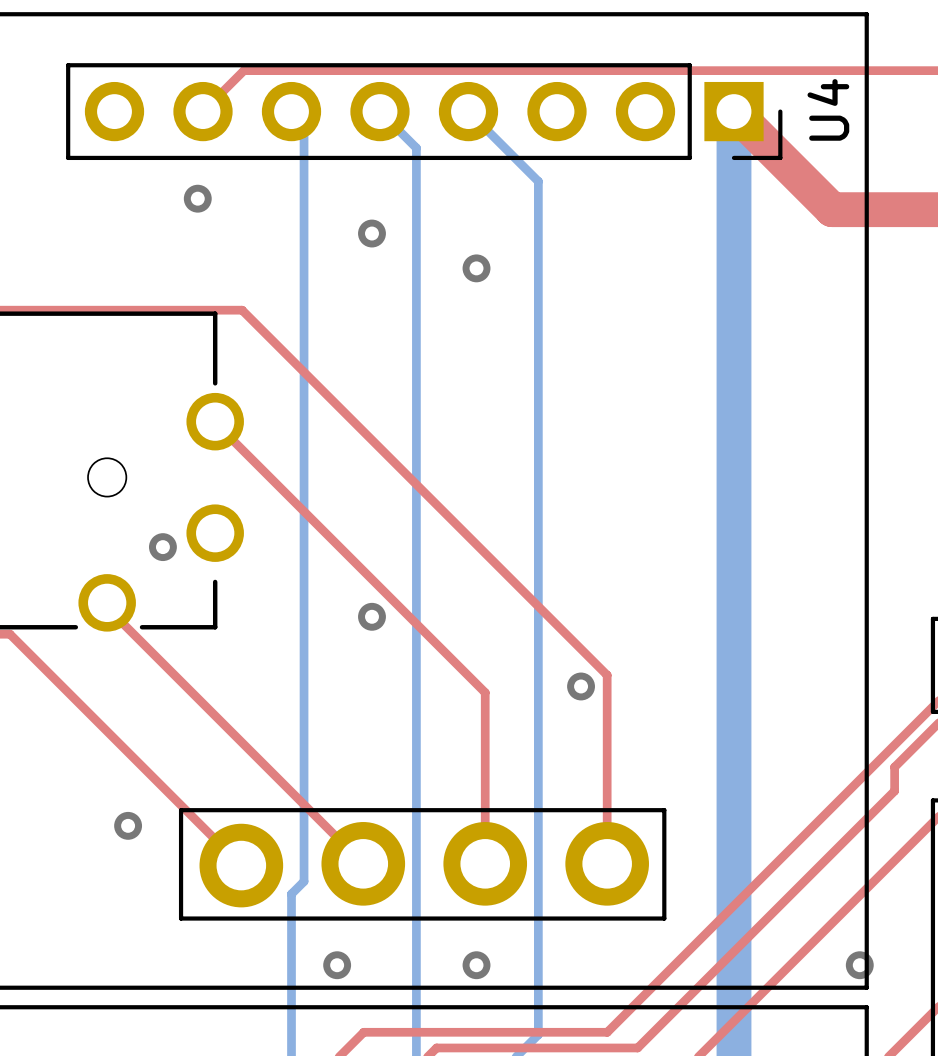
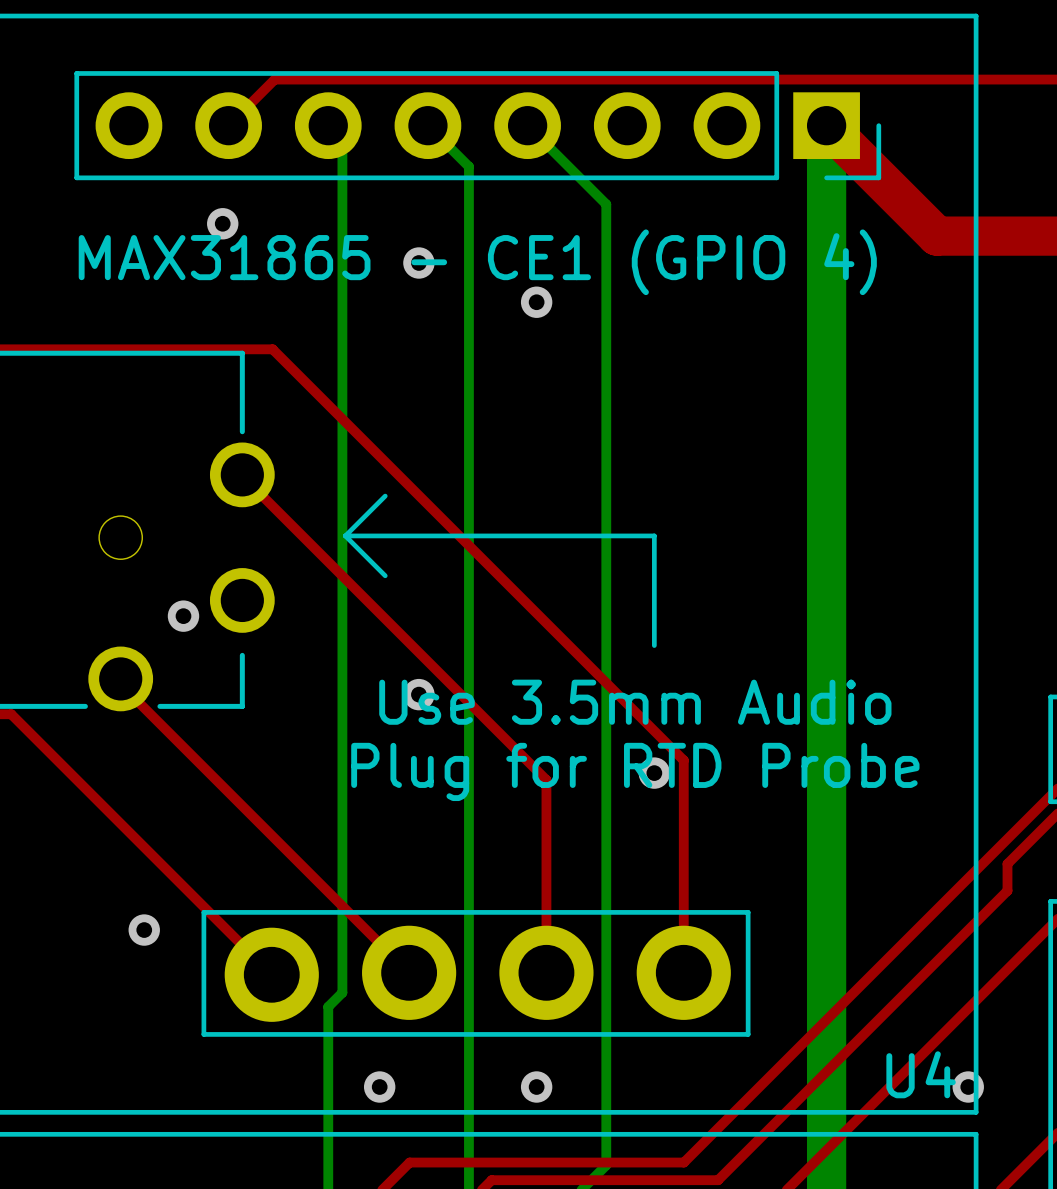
U4 name rotation: 0° (828, 109) -> 90° clockwise (921, 1074)
U4 name position: U4 (828, 109) -> U4 (921, 1074)
text: none -> MAX31865 - CE1 (GPIO 4) (477, 262)
line: none -> (385, 496) (345, 535)
line: none -> (345, 535) (385, 575)
line: none -> (345, 535) (654, 535) (654, 645)
text: none -> Use 3.5mm Audio (635, 702)
text: none -> Plug for RTD Probe (635, 771)

